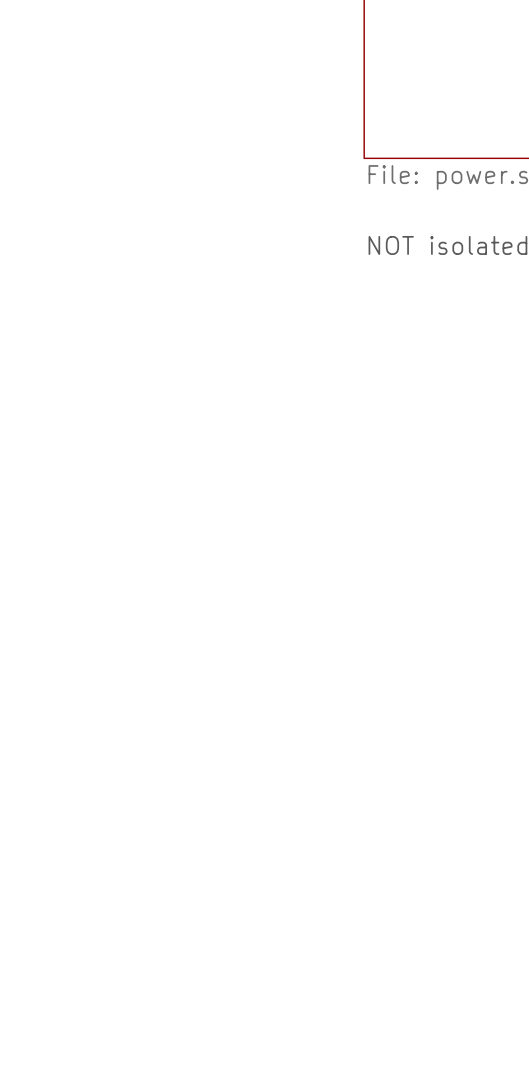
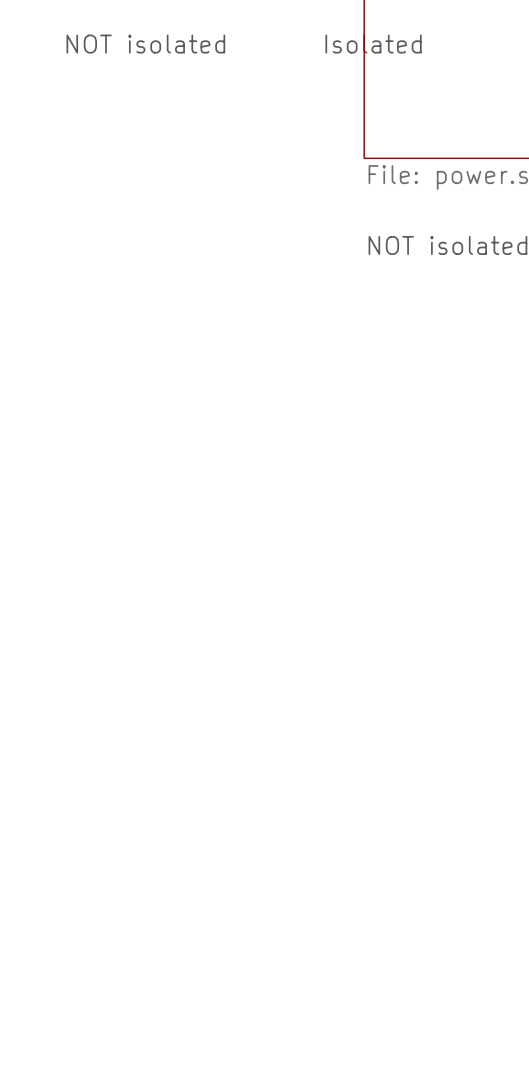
text: none -> NOT isolated (145, 44)
text: none -> Isolated (373, 44)

